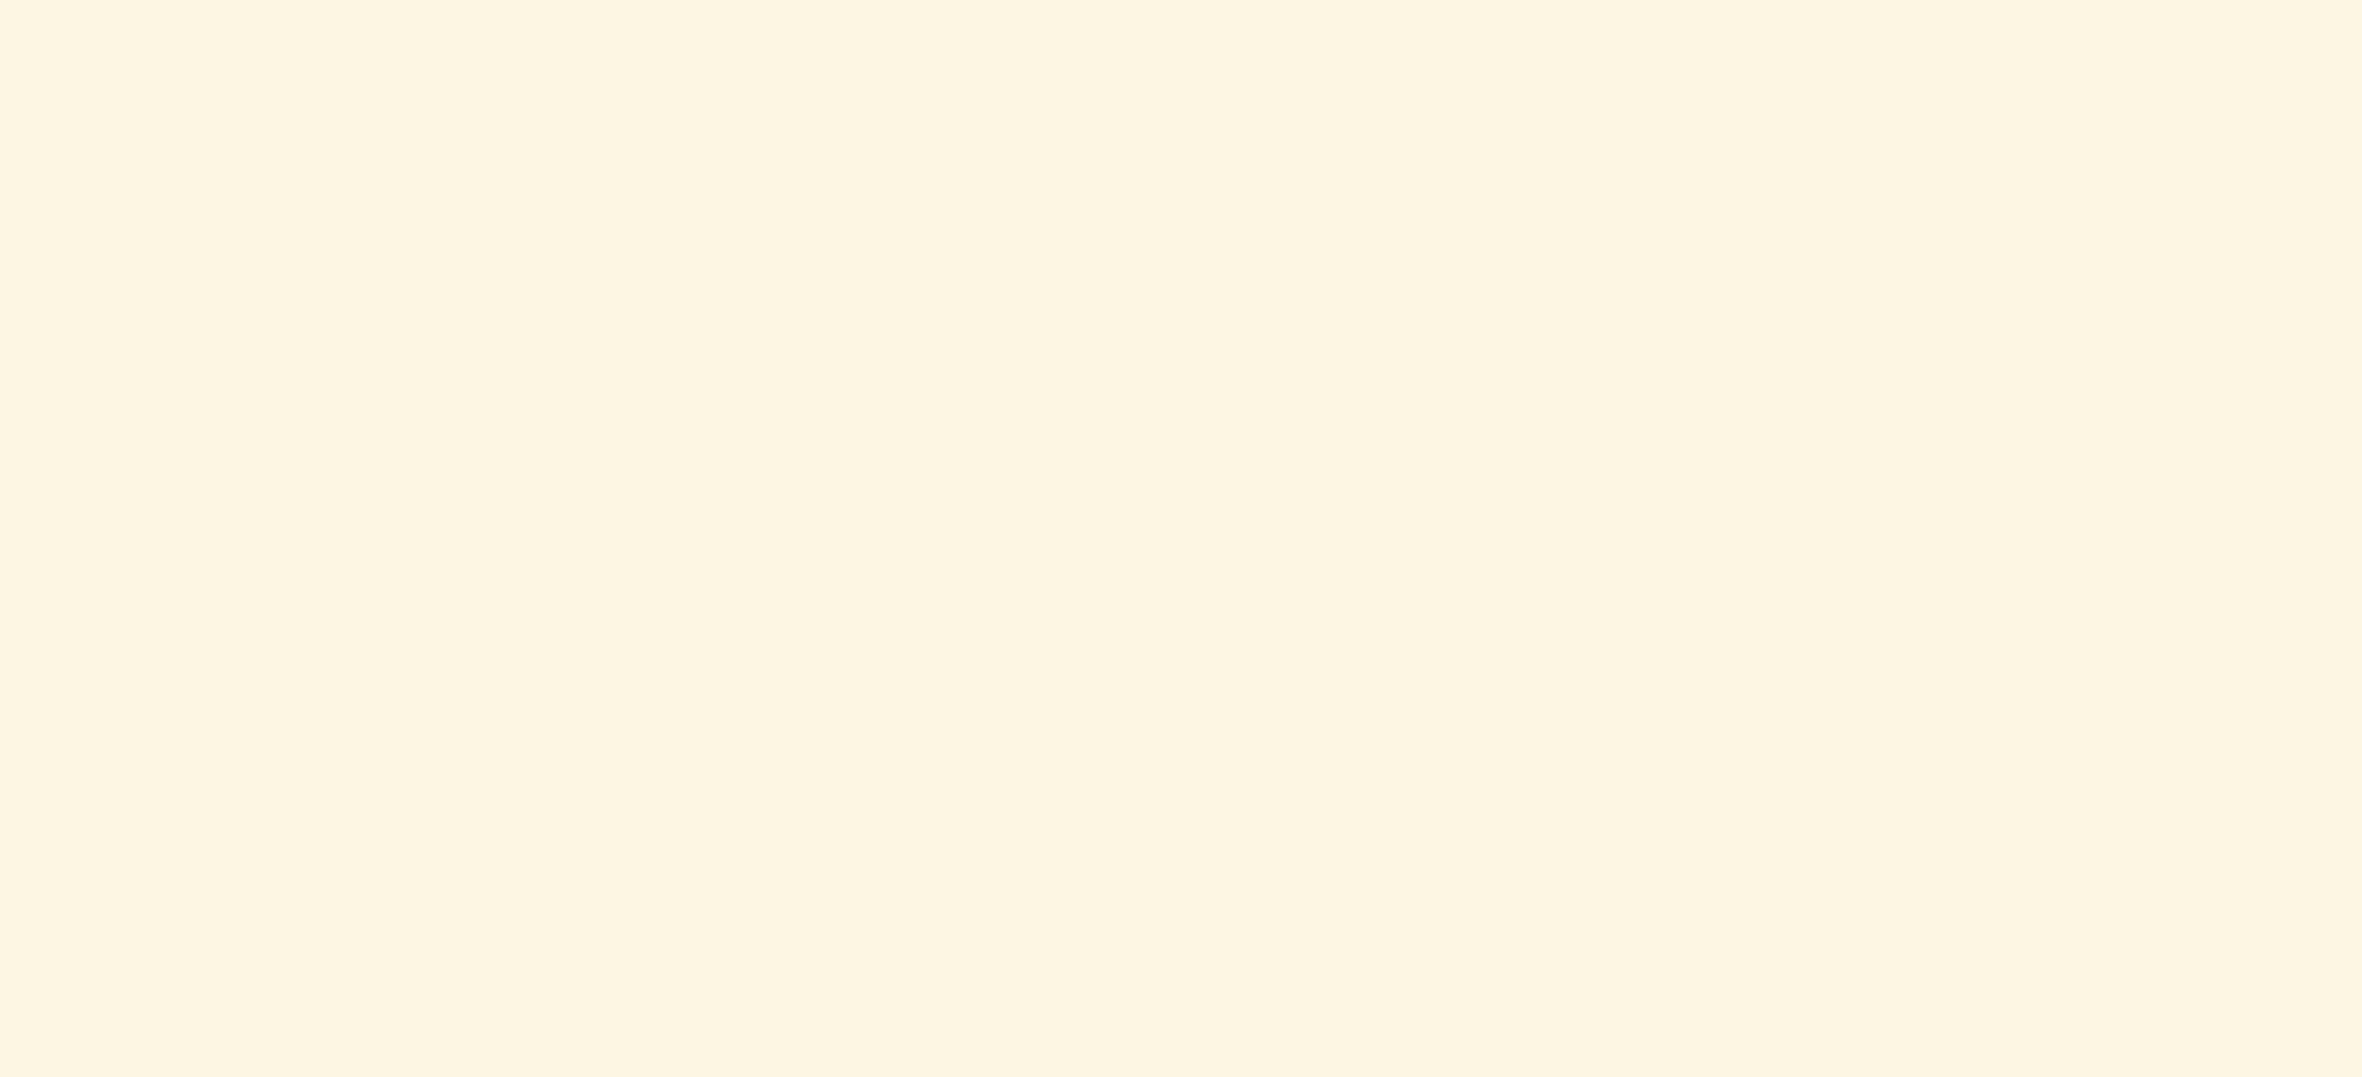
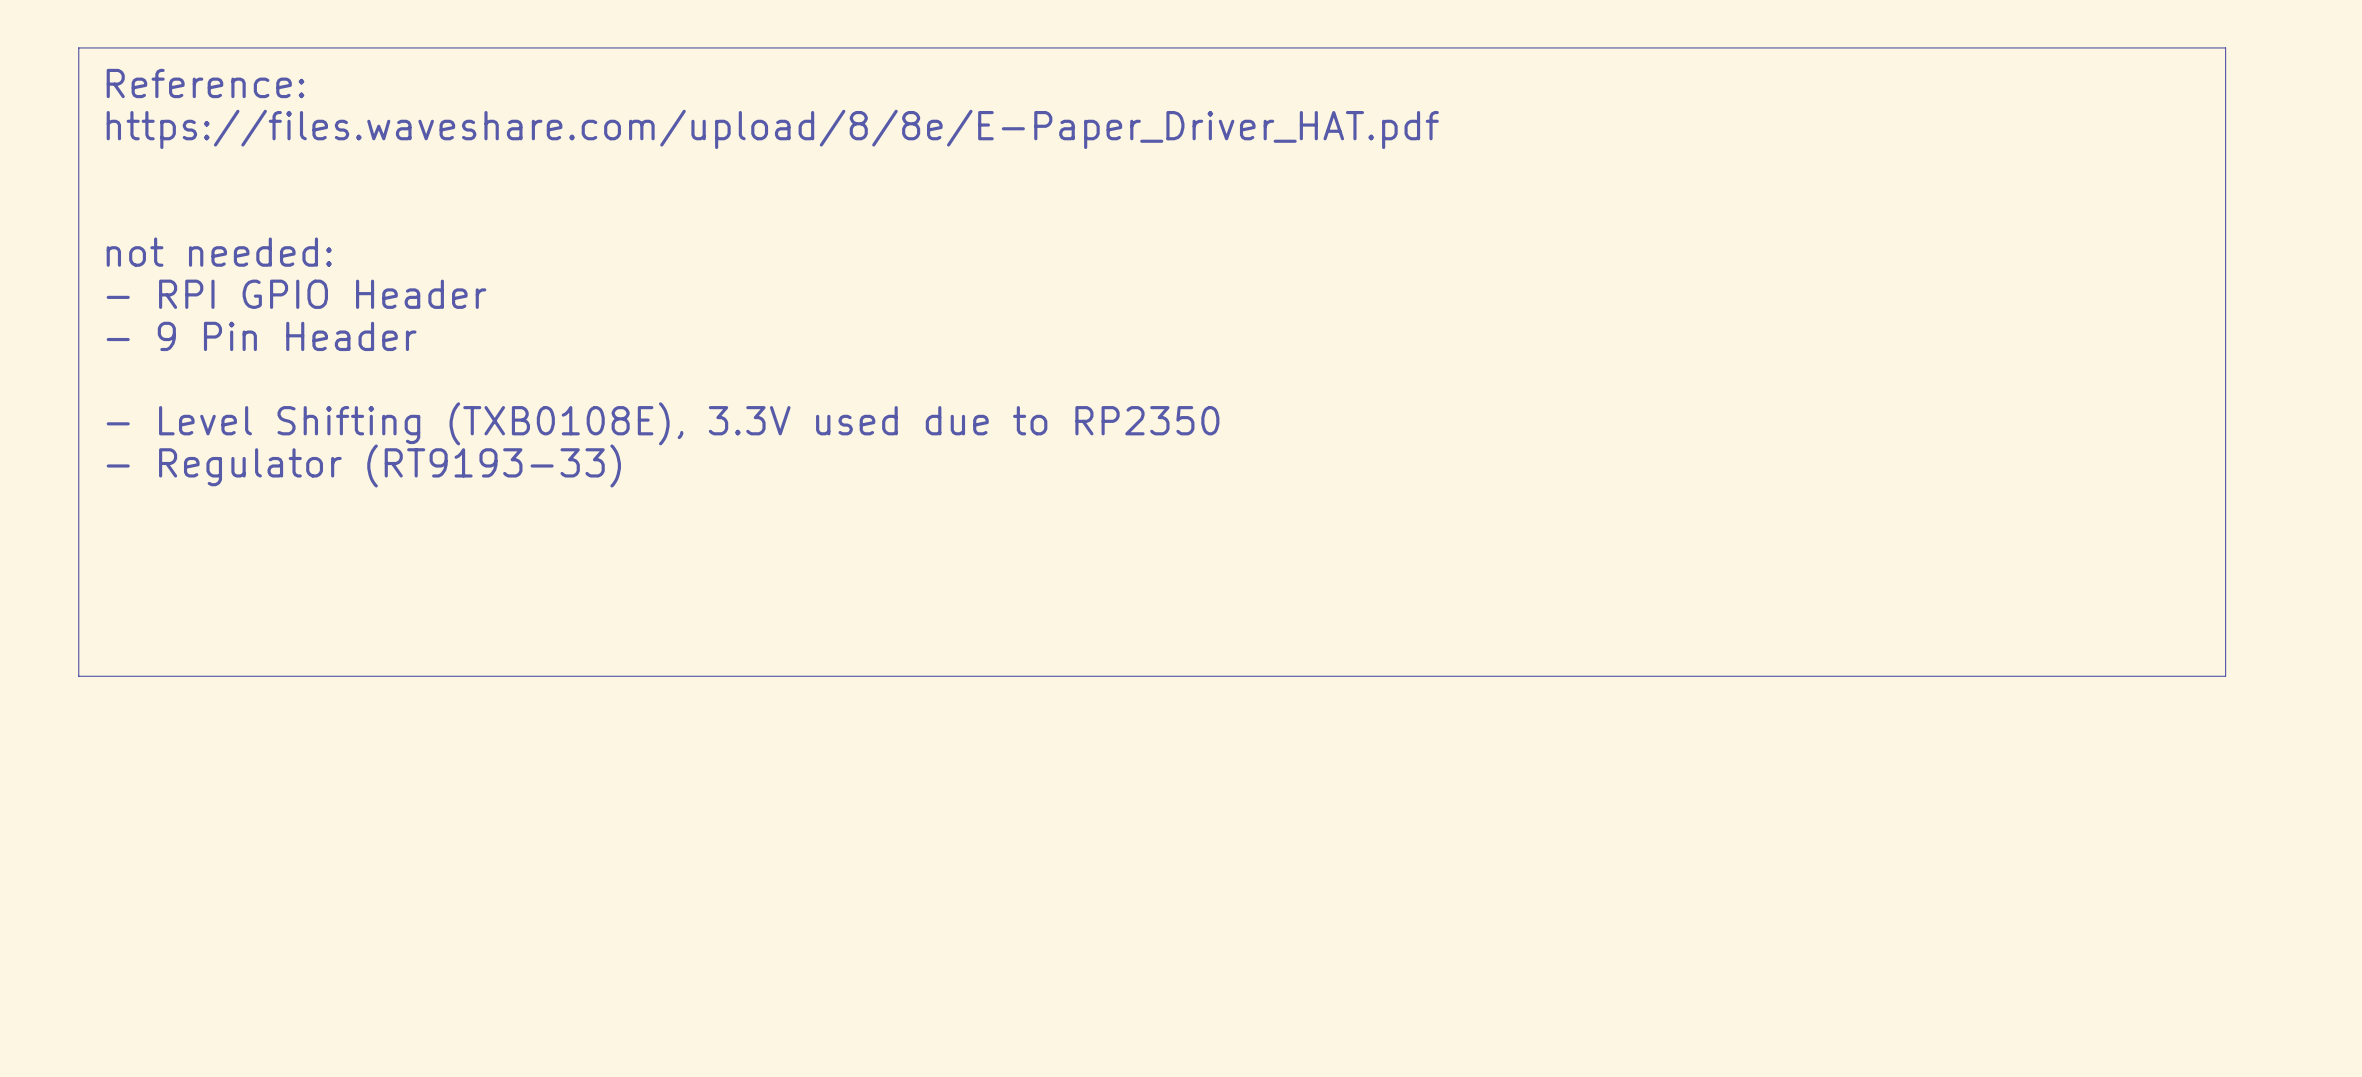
line: none -> (78, 47) (2225, 47) (2225, 676) (78, 676) (78, 47)
text: none -> Reference: (205, 83)
text: none -> https://files.waveshare.com/upload/8/8e/E-Paper_Driver_HAT.pdf (772, 129)
text: none -> not needed: (219, 252)
text: none -> - RPI GPIO Header (296, 294)
text: none -> - 9 Pin Header (261, 336)
text: none -> - Level Shifting (TXB0108E), 3.3V used due to RP2350 (663, 423)
text: none -> - Regulator (RT9193-33) (363, 465)

